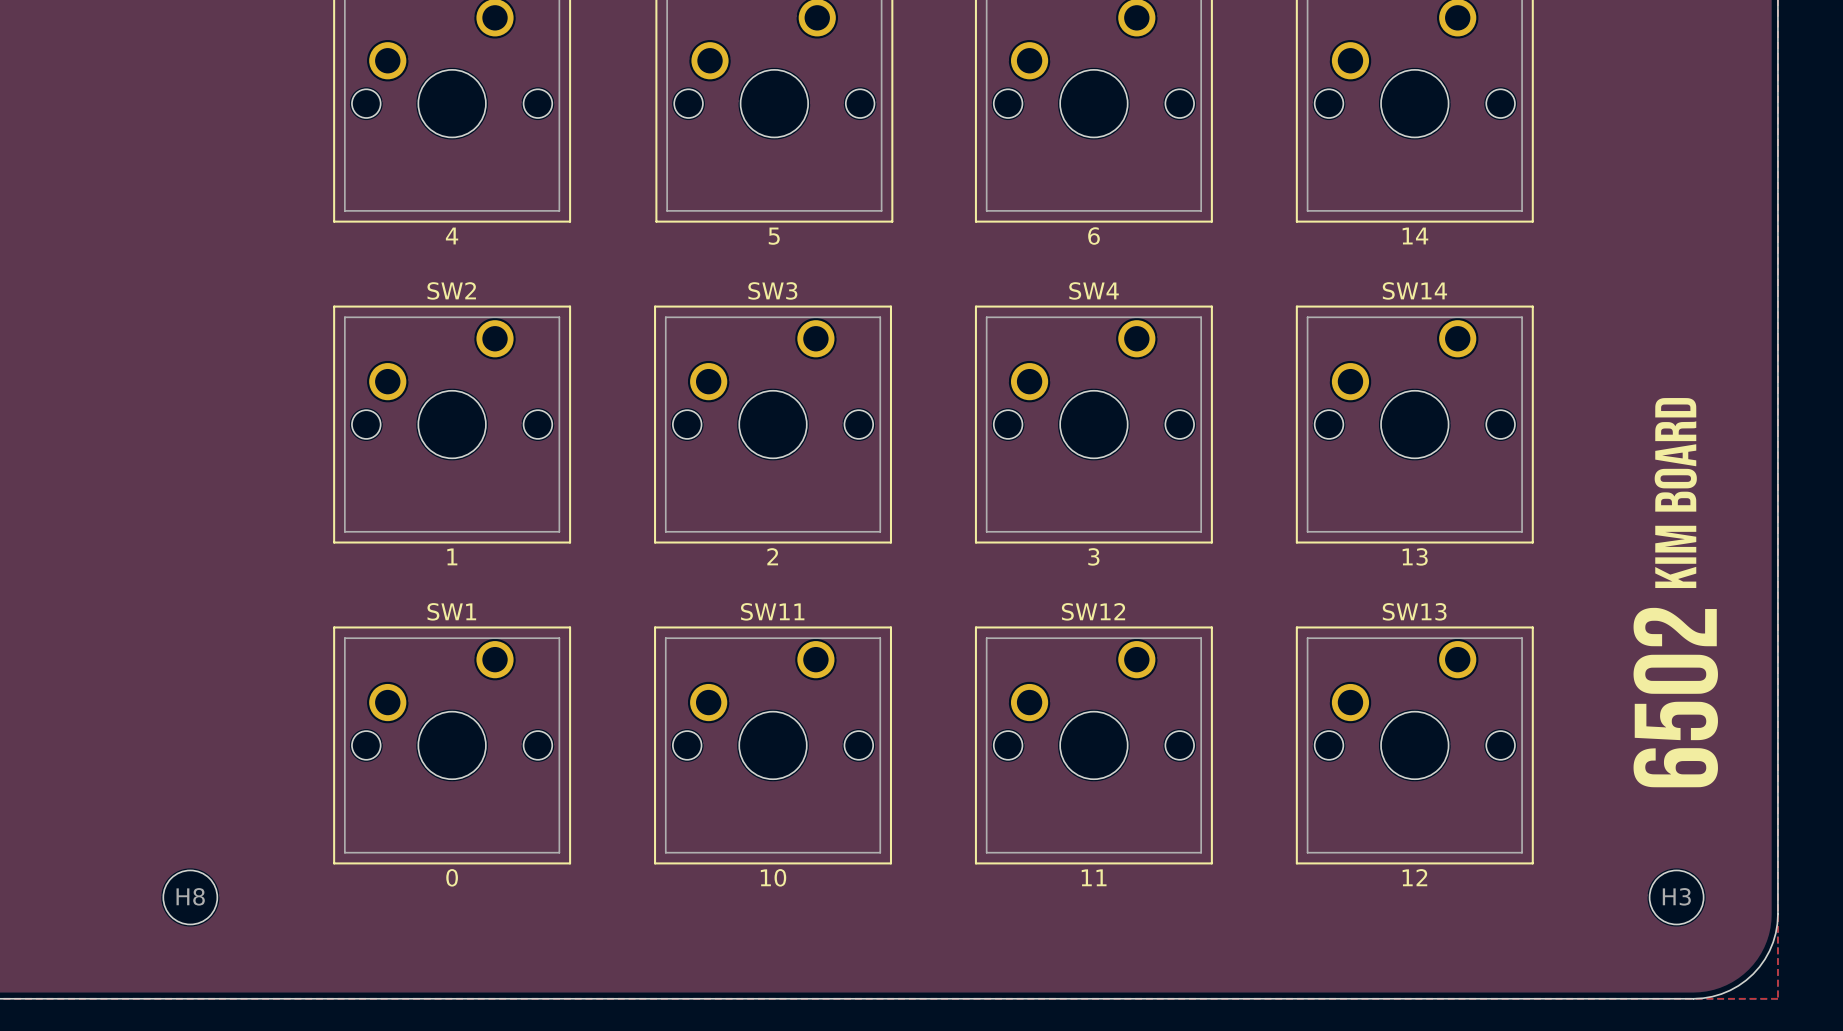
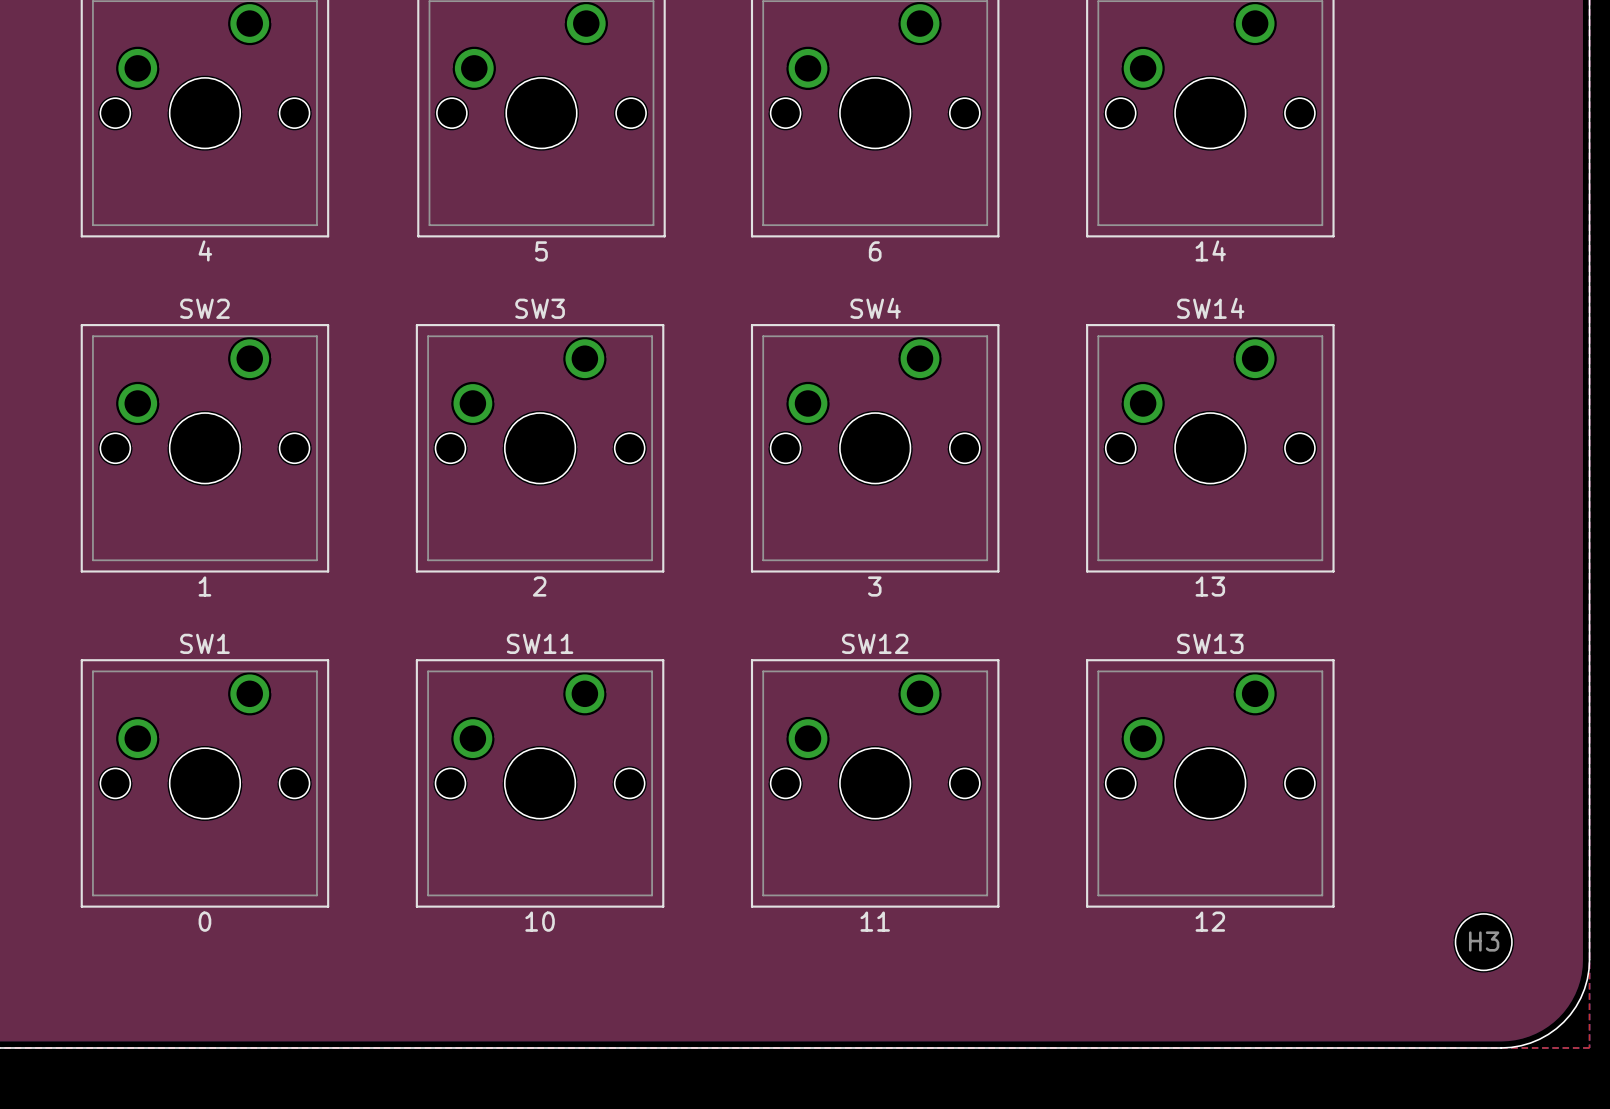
drawing: [1633, 398, 1718, 788] -> none

